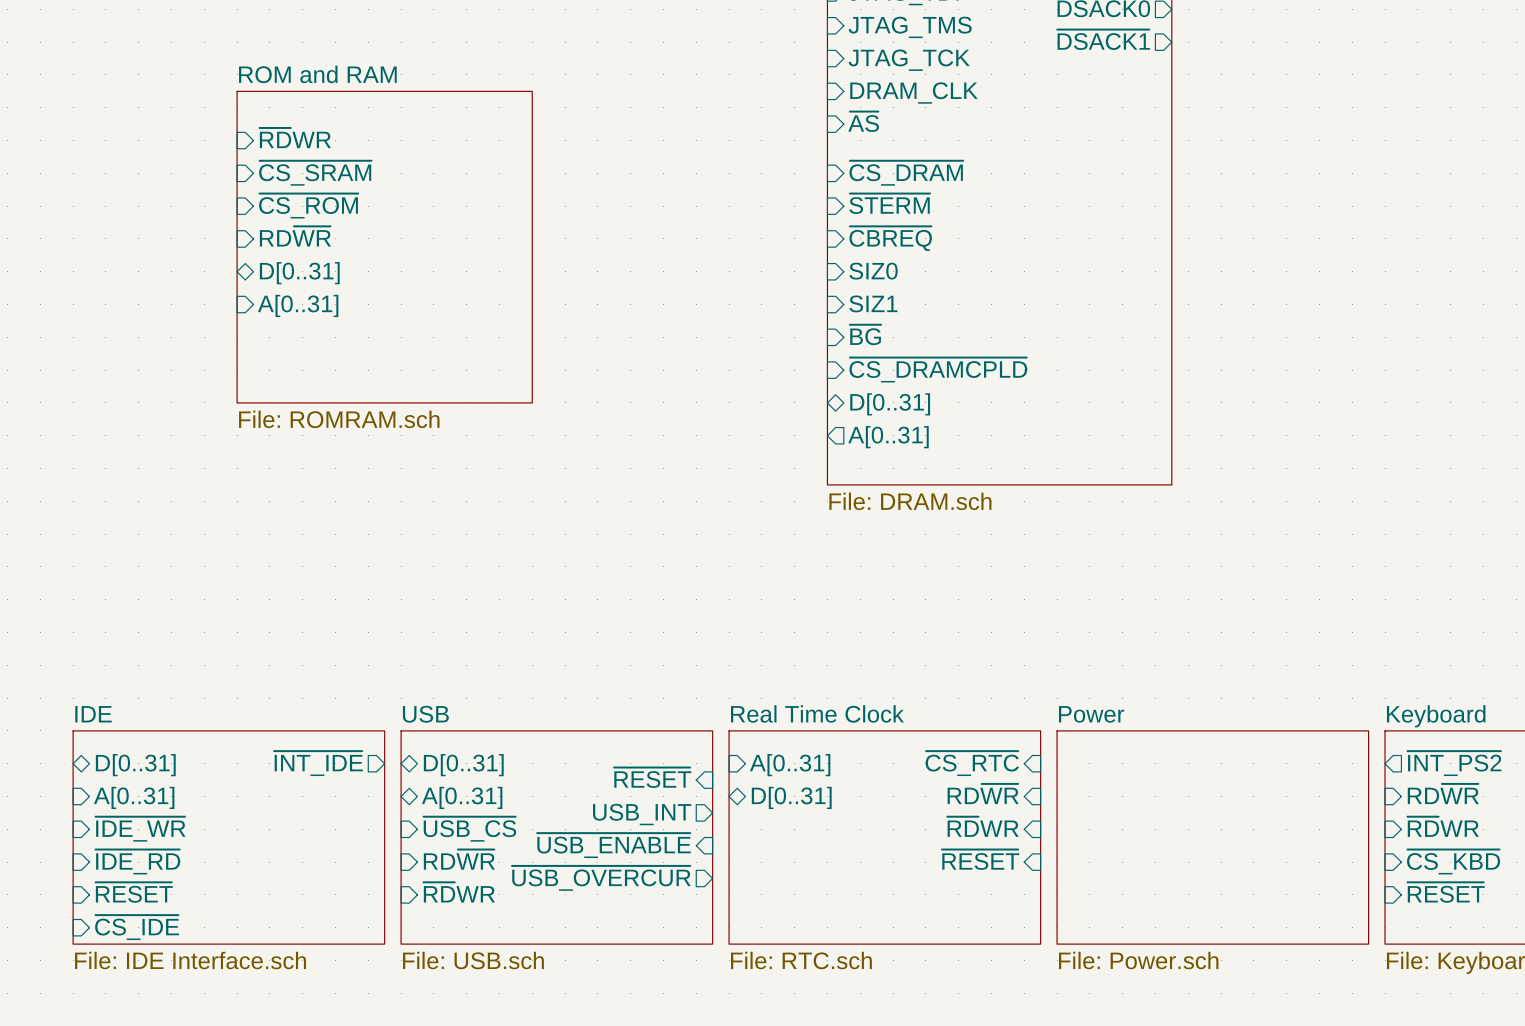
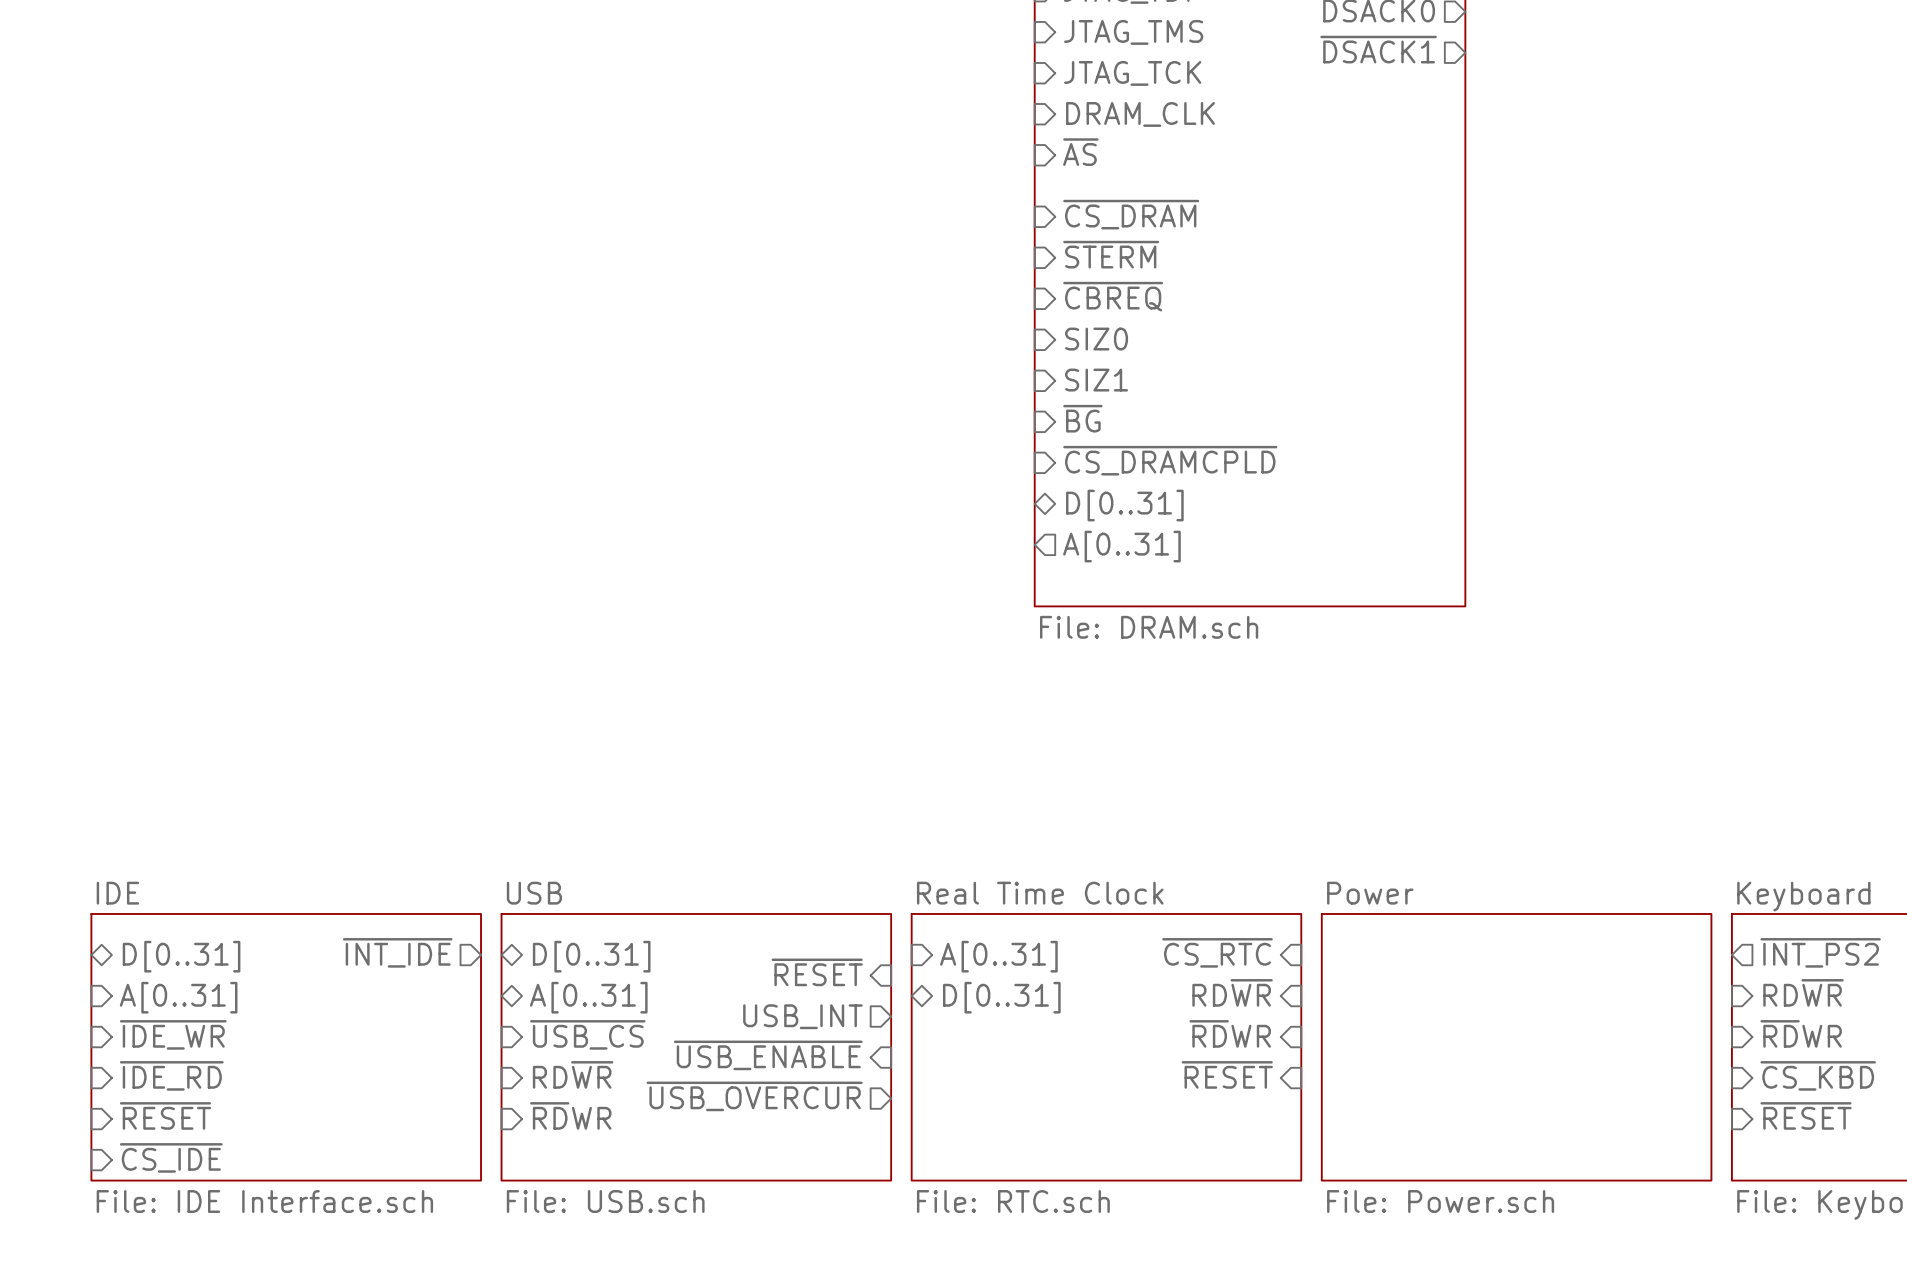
sheet pin: ~{RD}WR (295, 138) -> none
sheet pin: ~{CS_SRAM} (315, 173) -> none
sheet pin: ~{CS_ROM} (308, 206) -> none
sheet pin: RD~{WR} (295, 236) -> none
sheet ROM and RAM: File: ROMRAM.sch (384, 247) -> none
sheet pin: D[0..31] (299, 273) -> none
sheet pin: A[0..31] (298, 305) -> none

